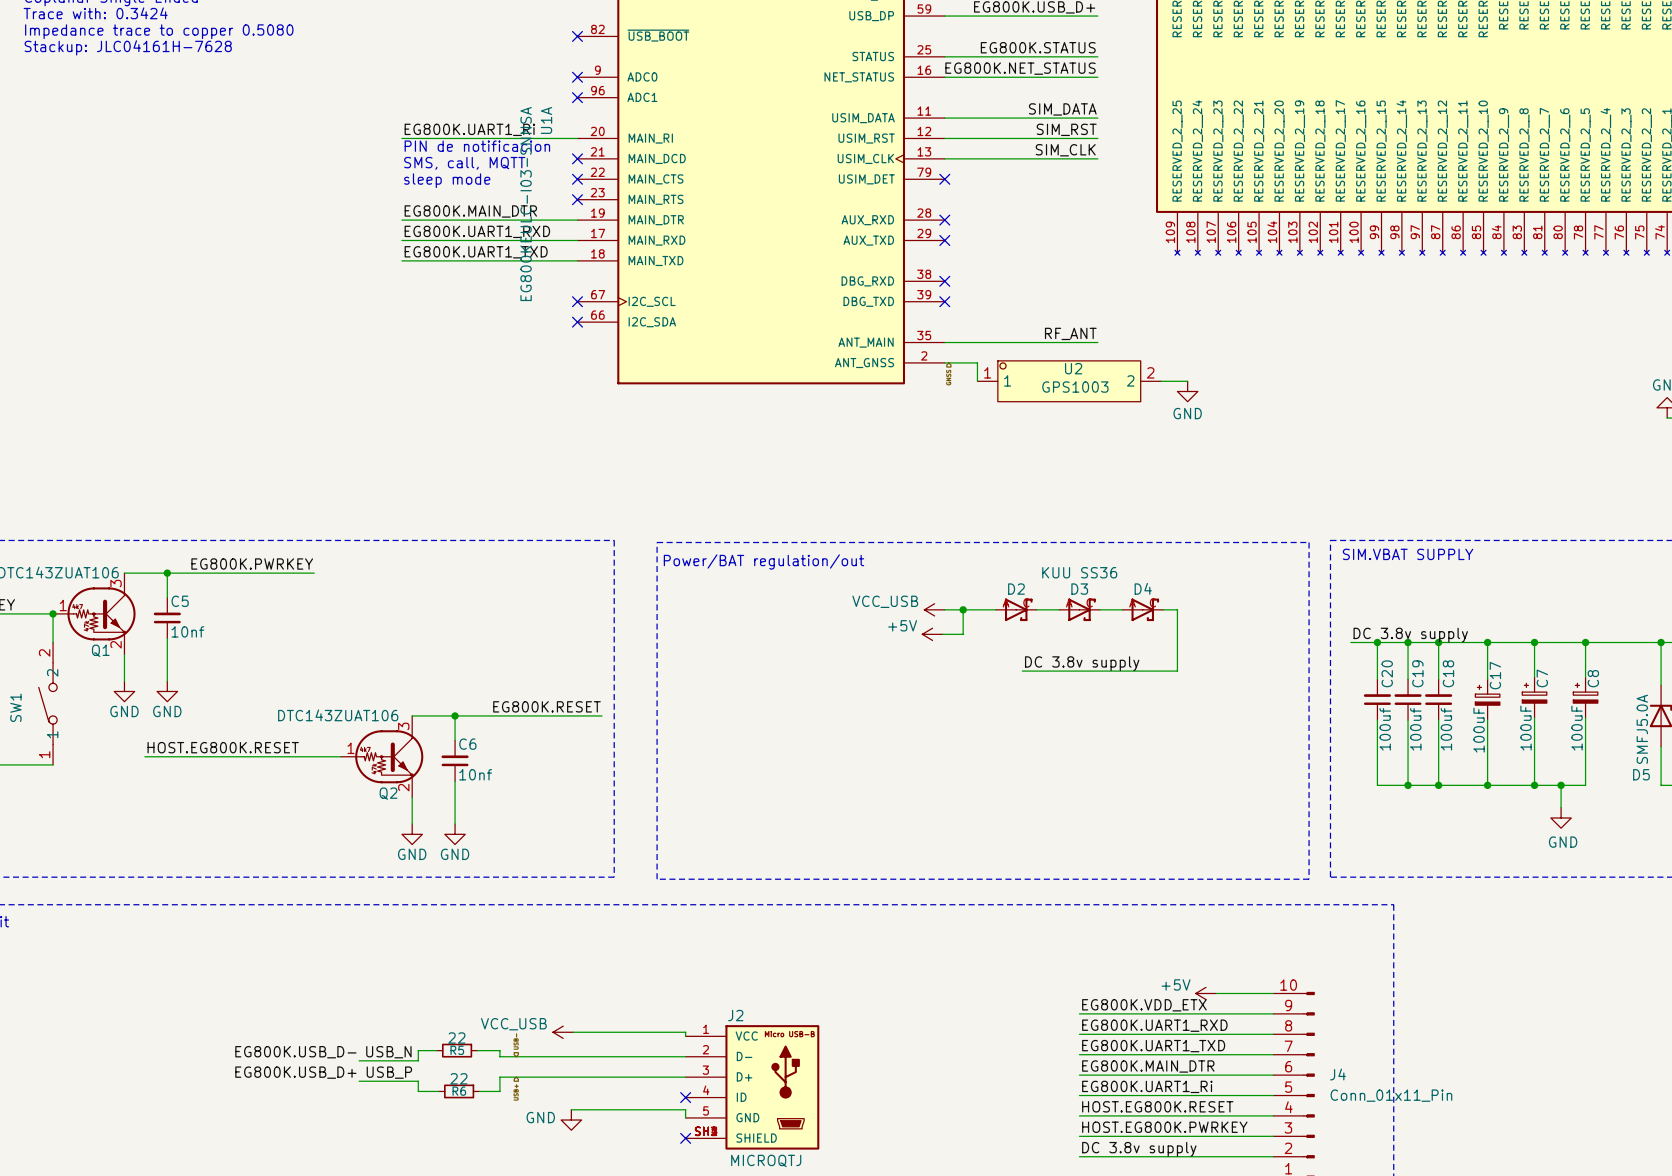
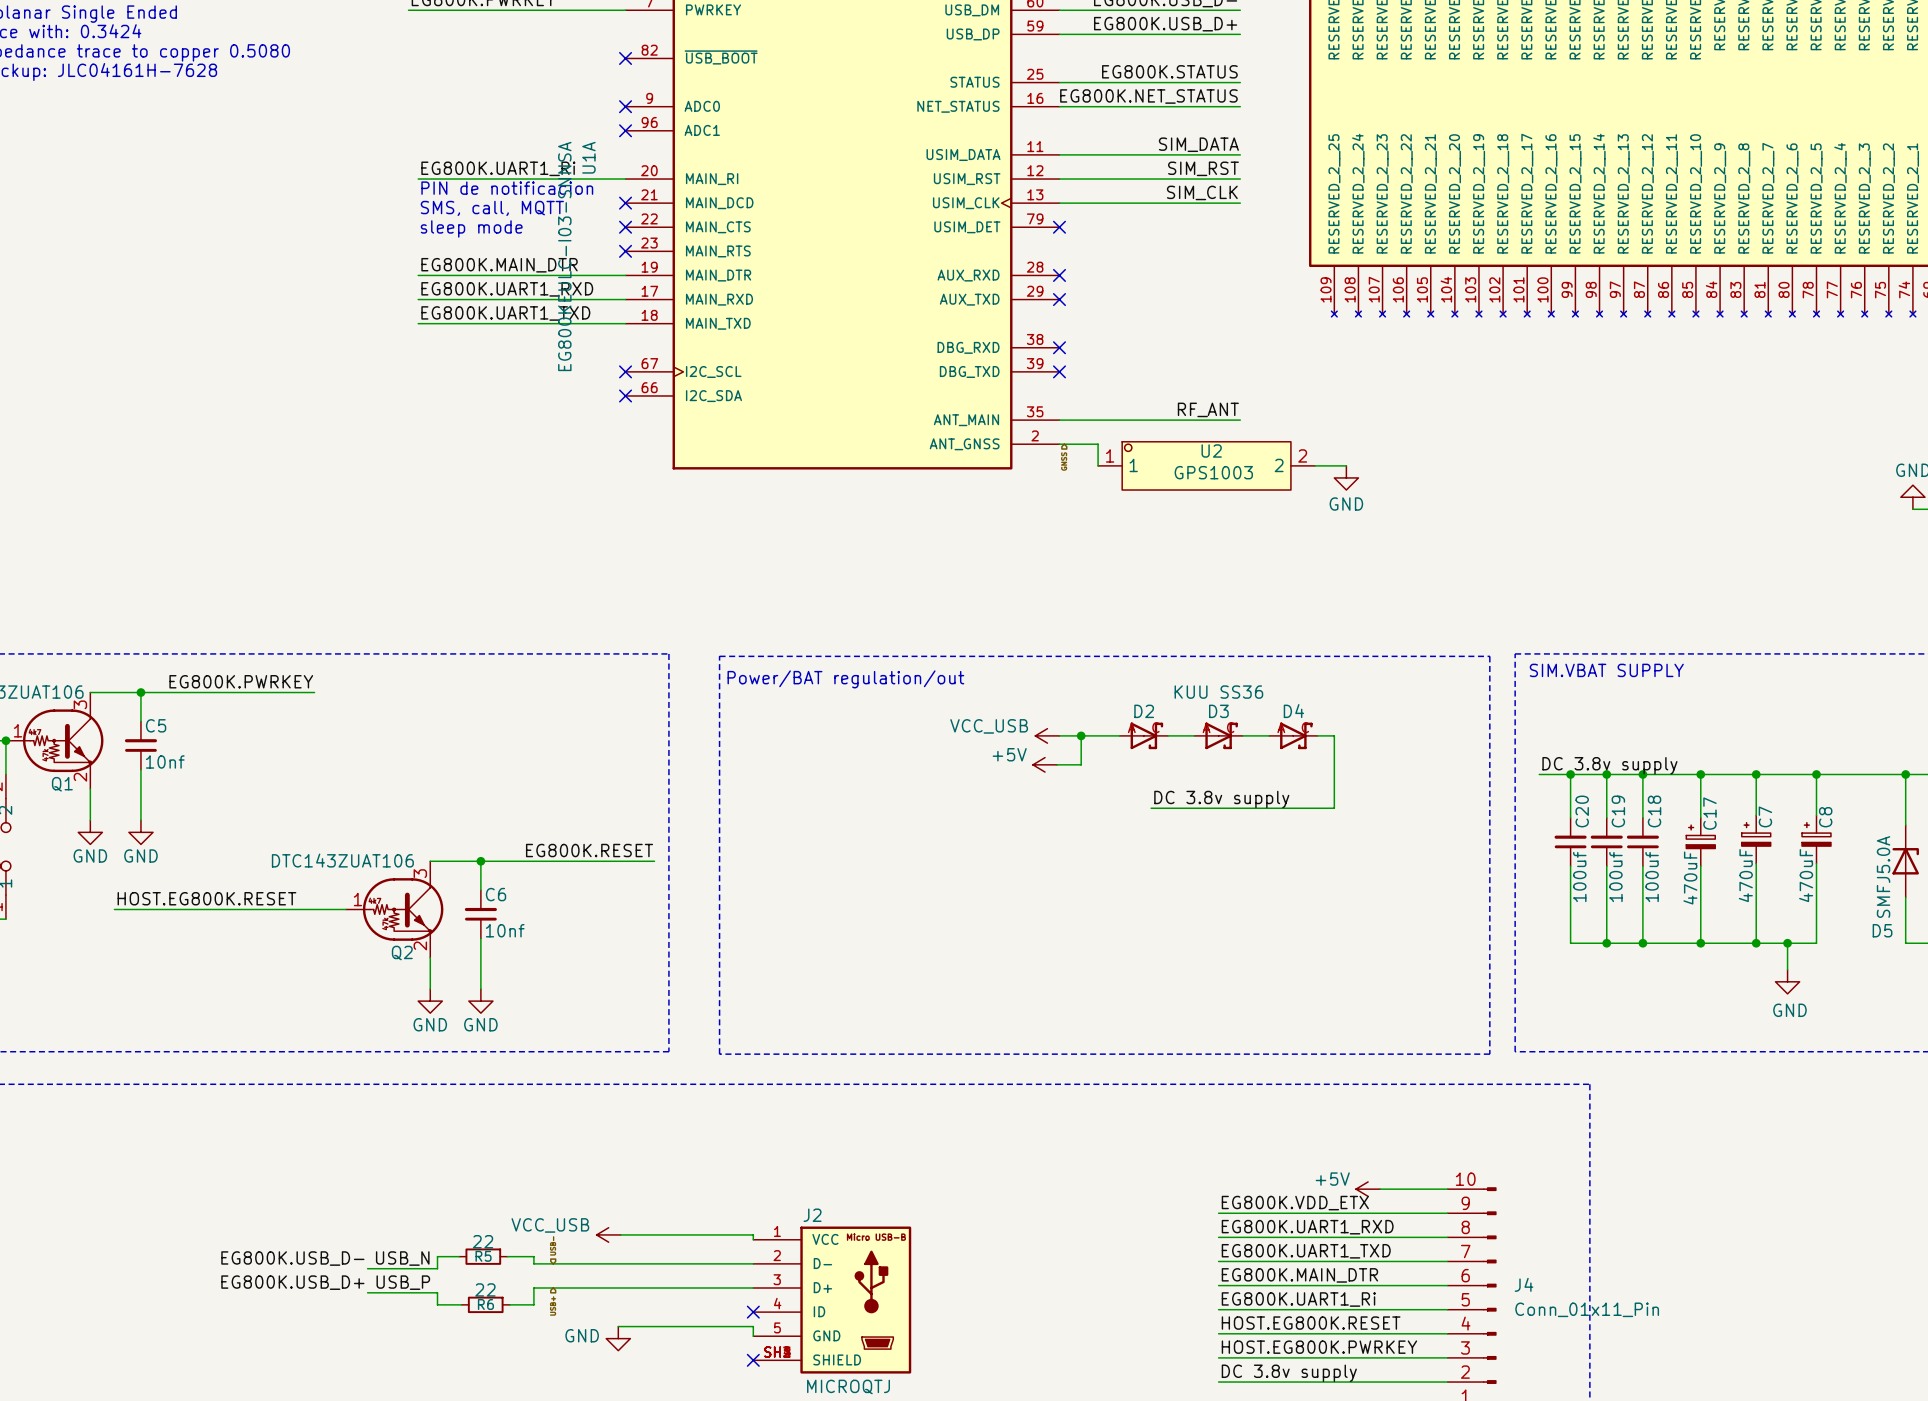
C7 value: 100uF (1526, 728) -> 470uF (1745, 875)
C8 value: 100uF (1577, 728) -> 470uF (1806, 875)
C17 value: 100uF (1479, 730) -> 470uF (1690, 878)

